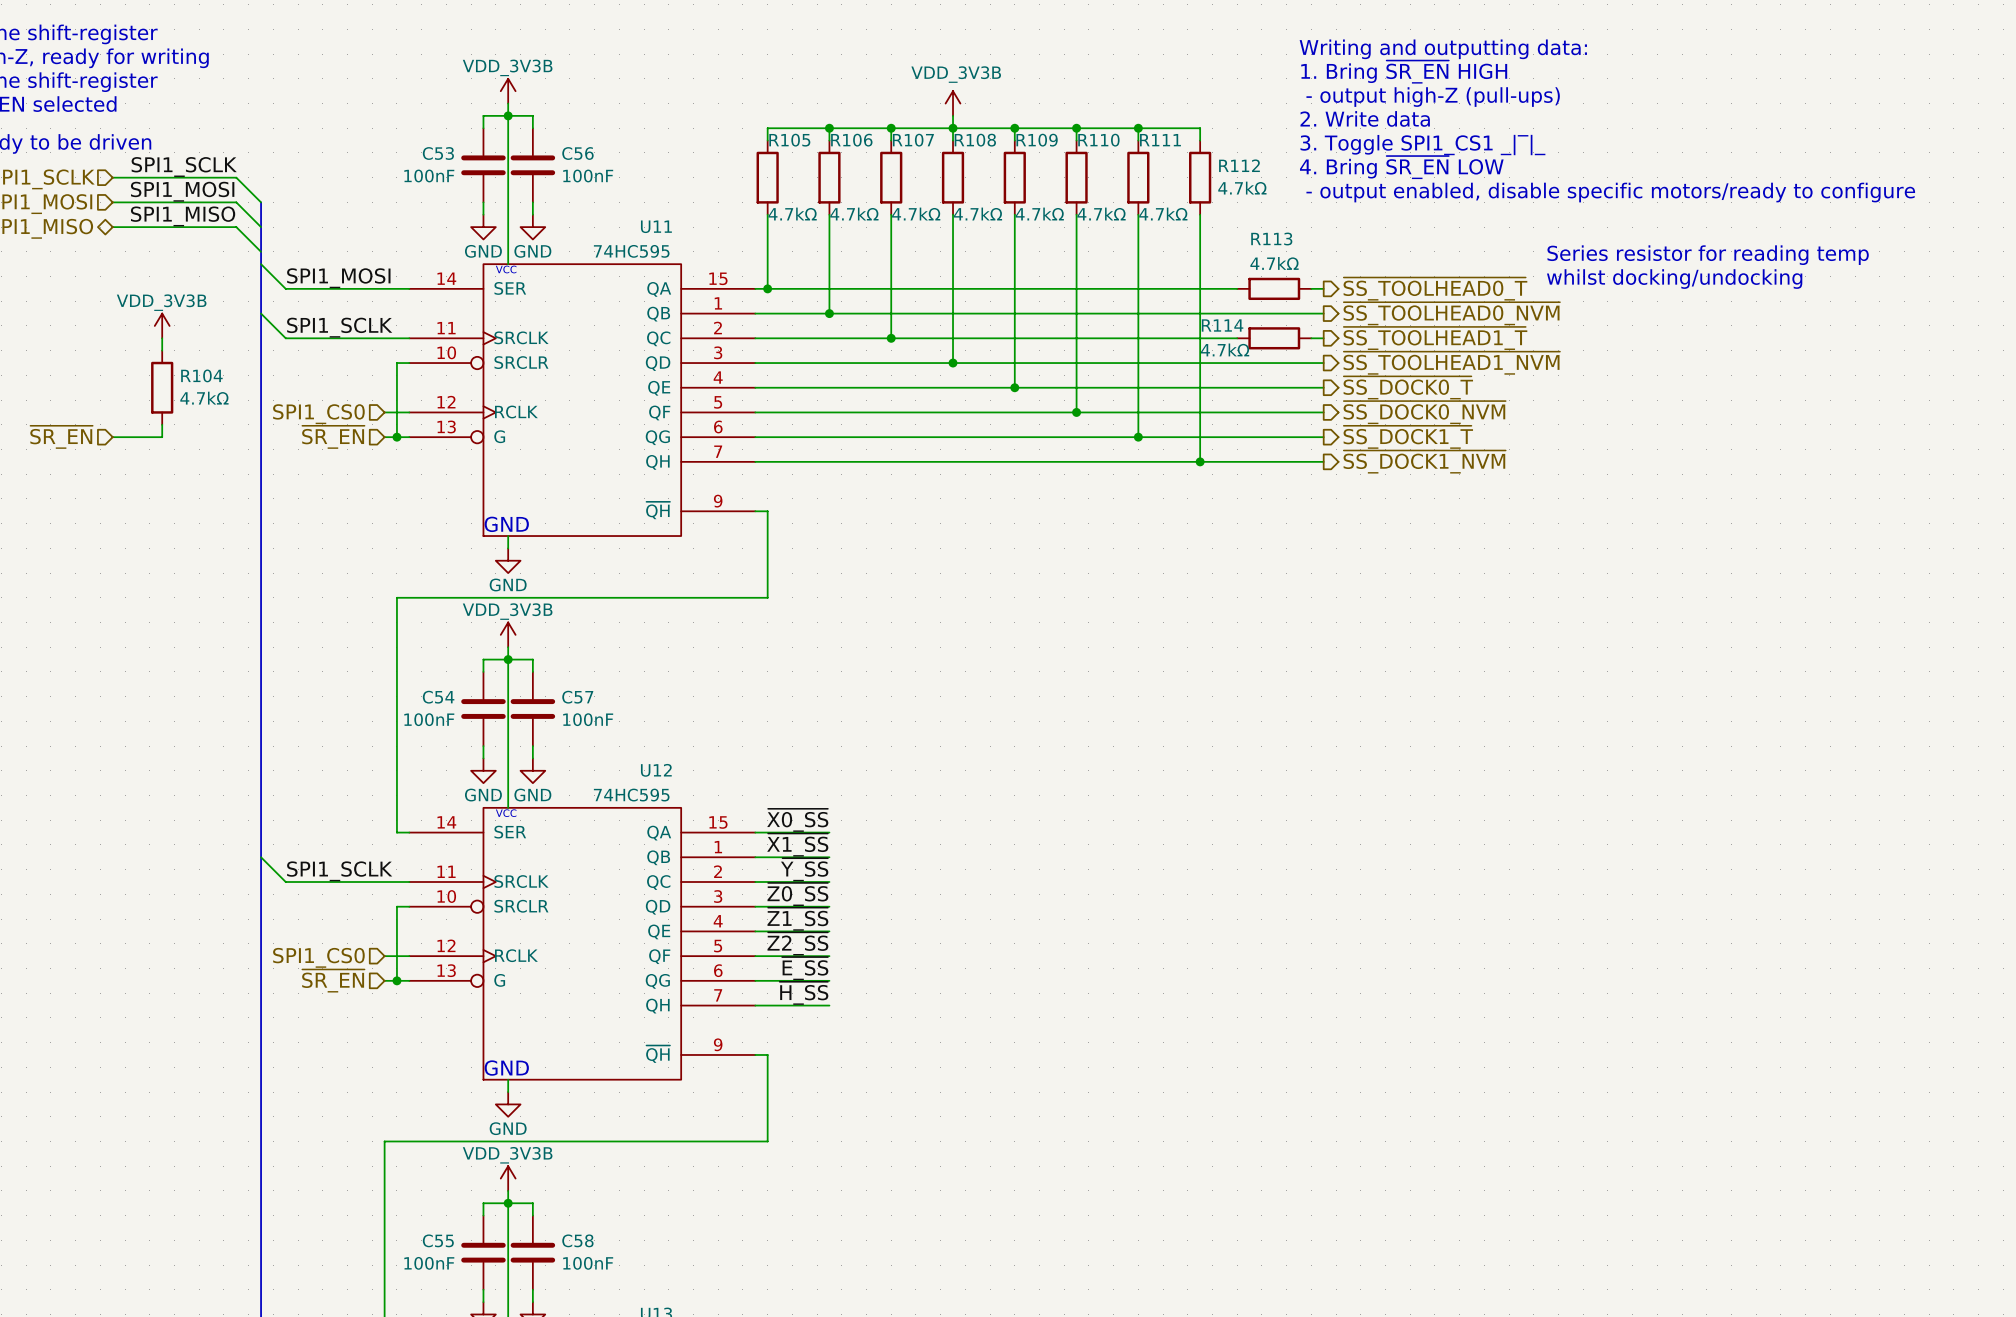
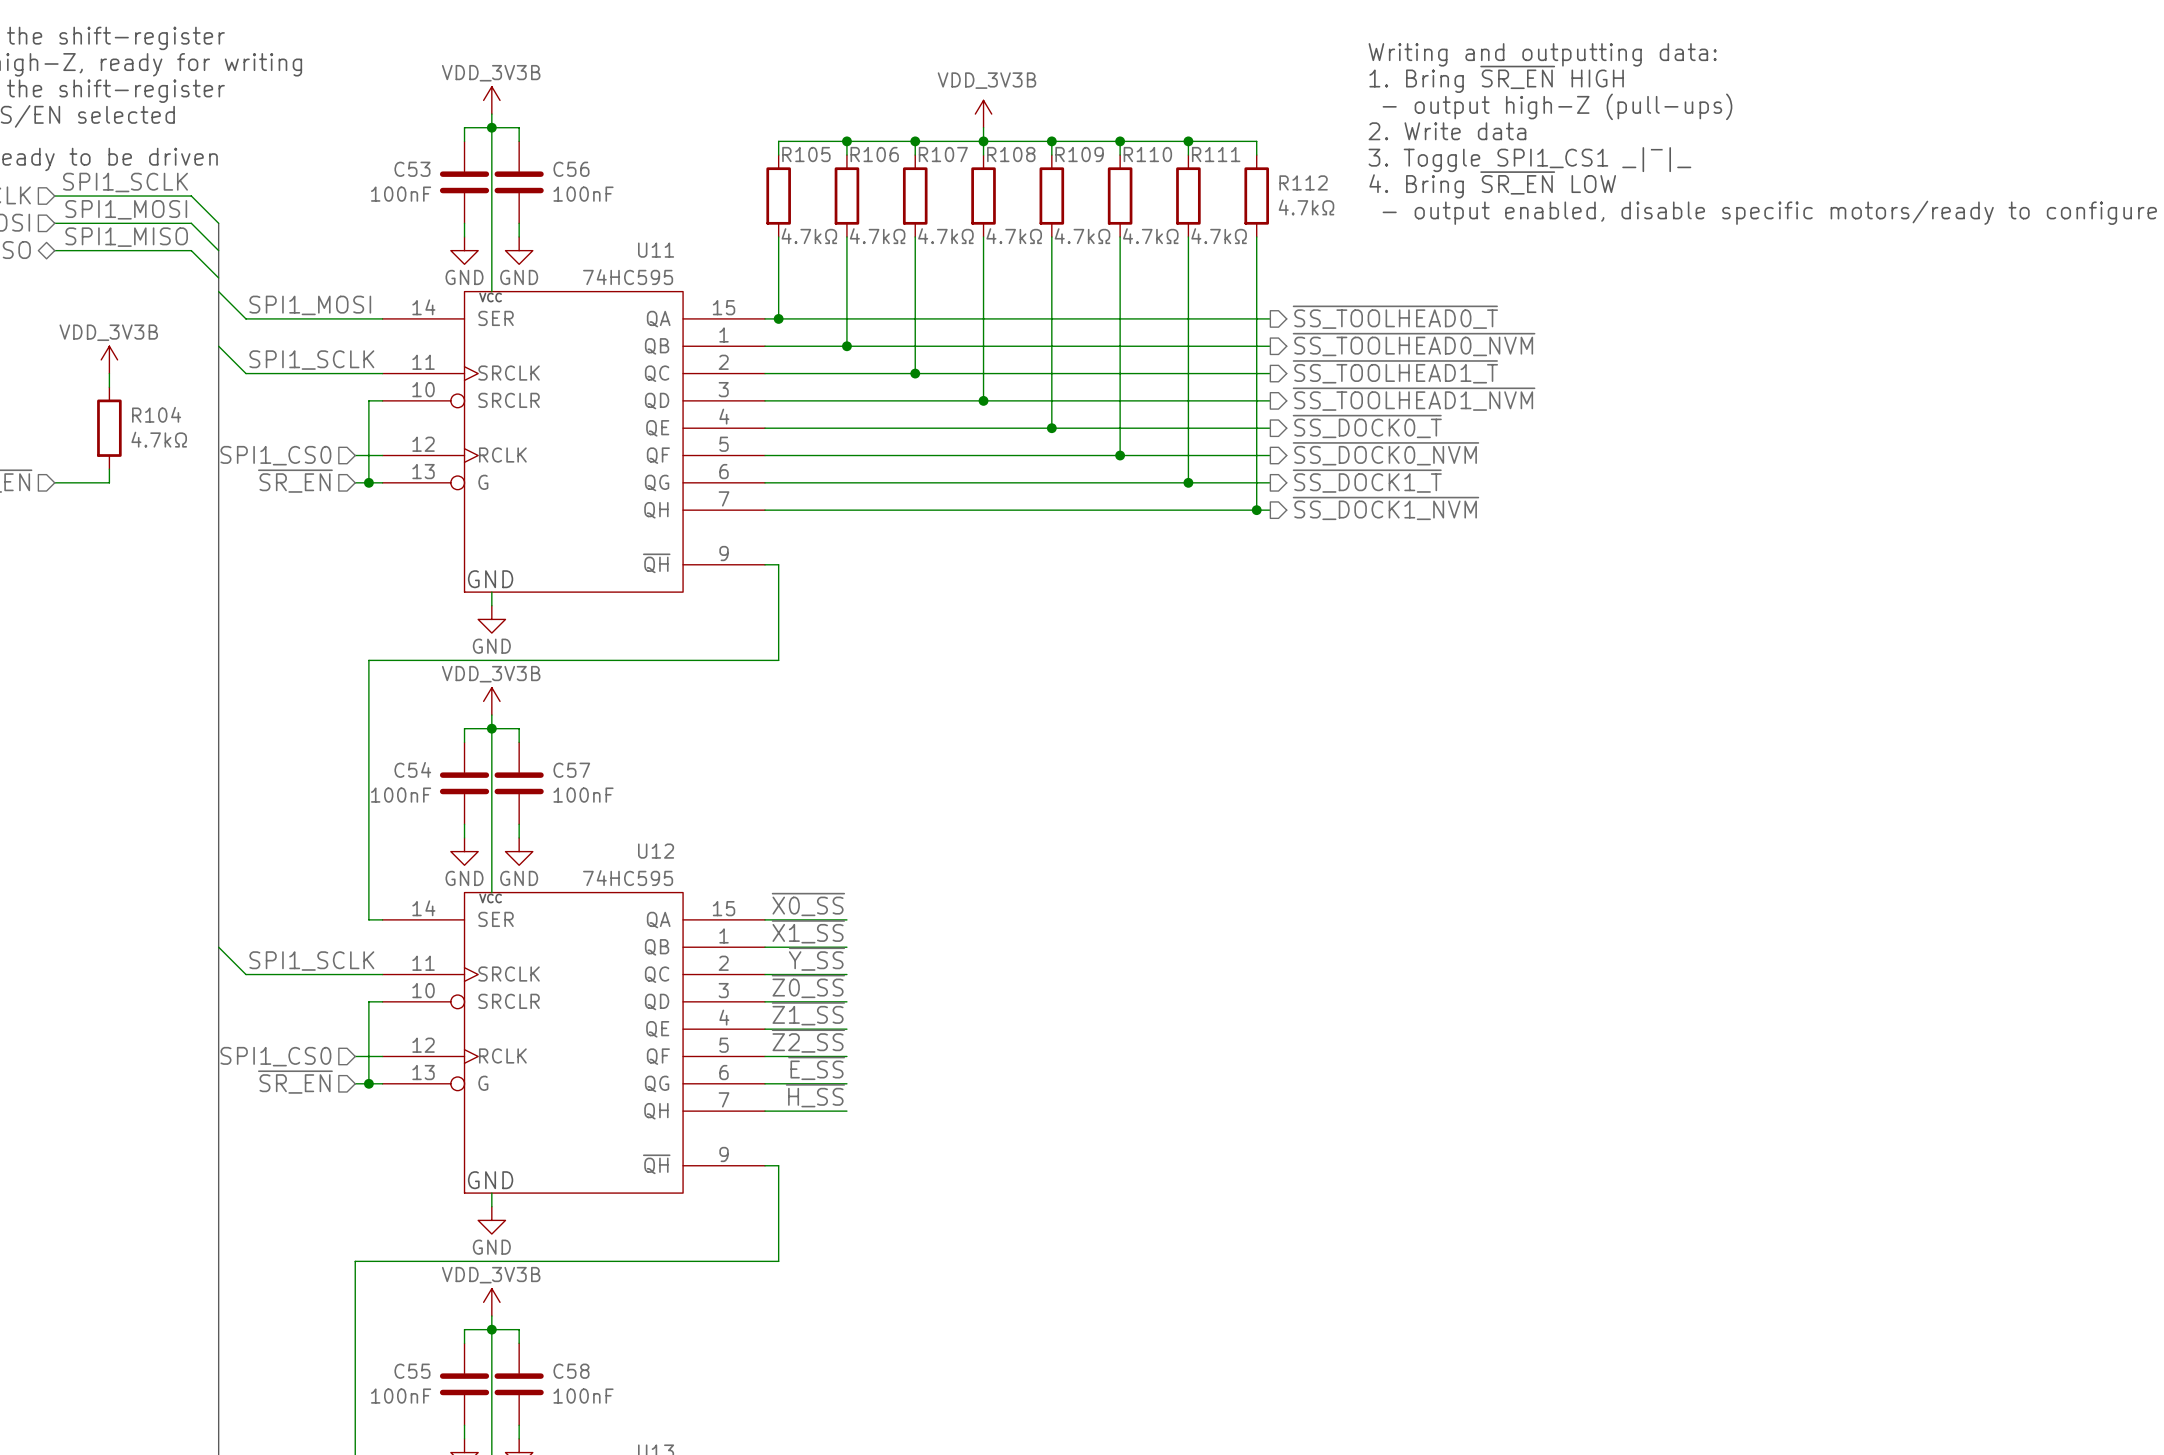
text: Series resistor for reading temp (1708, 255) -> none
text: whilst docking/undocking (1674, 279) -> none
wire: (1212, 288) (1237, 288) -> none
R113: 4.7kΩ (1274, 288) -> none
wire: (1311, 288) (1323, 288) -> none
hierarchical label position: ~{SS_TOOLHEAD0_T} (1435, 289) -> ~{SS_TOOLHEAD0_T} (1395, 317)
wire: (1212, 313) (1323, 313) -> none
hierarchical label position: ~{SS_TOOLHEAD0_NVM} (1451, 313) -> ~{SS_TOOLHEAD0_NVM} (1414, 344)
wire: (1212, 338) (1237, 338) -> none
R114: 4.7kΩ (1274, 338) -> none
wire: (1311, 338) (1323, 338) -> none
hierarchical label position: ~{SS_TOOLHEAD1_T} (1435, 338) -> ~{SS_TOOLHEAD1_T} (1395, 371)
wire: (1212, 363) (1323, 363) -> none
hierarchical label position: ~{SS_TOOLHEAD1_NVM} (1451, 363) -> ~{SS_TOOLHEAD1_NVM} (1414, 399)
wire: (1212, 387) (1323, 387) -> none
hierarchical label position: ~{SS_DOCK0_T} (1408, 387) -> ~{SS_DOCK0_T} (1367, 426)
wire: (1212, 412) (1323, 412) -> none
hierarchical label position: ~{SS_DOCK0_NVM} (1424, 412) -> ~{SS_DOCK0_NVM} (1385, 453)
wire: (1212, 437) (1323, 437) -> none
hierarchical label position: ~{SS_DOCK1_T} (1408, 437) -> ~{SS_DOCK1_T} (1367, 481)
wire: (1212, 461) (1323, 461) -> none
hierarchical label position: ~{SS_DOCK1_NVM} (1424, 462) -> ~{SS_DOCK1_NVM} (1385, 508)

